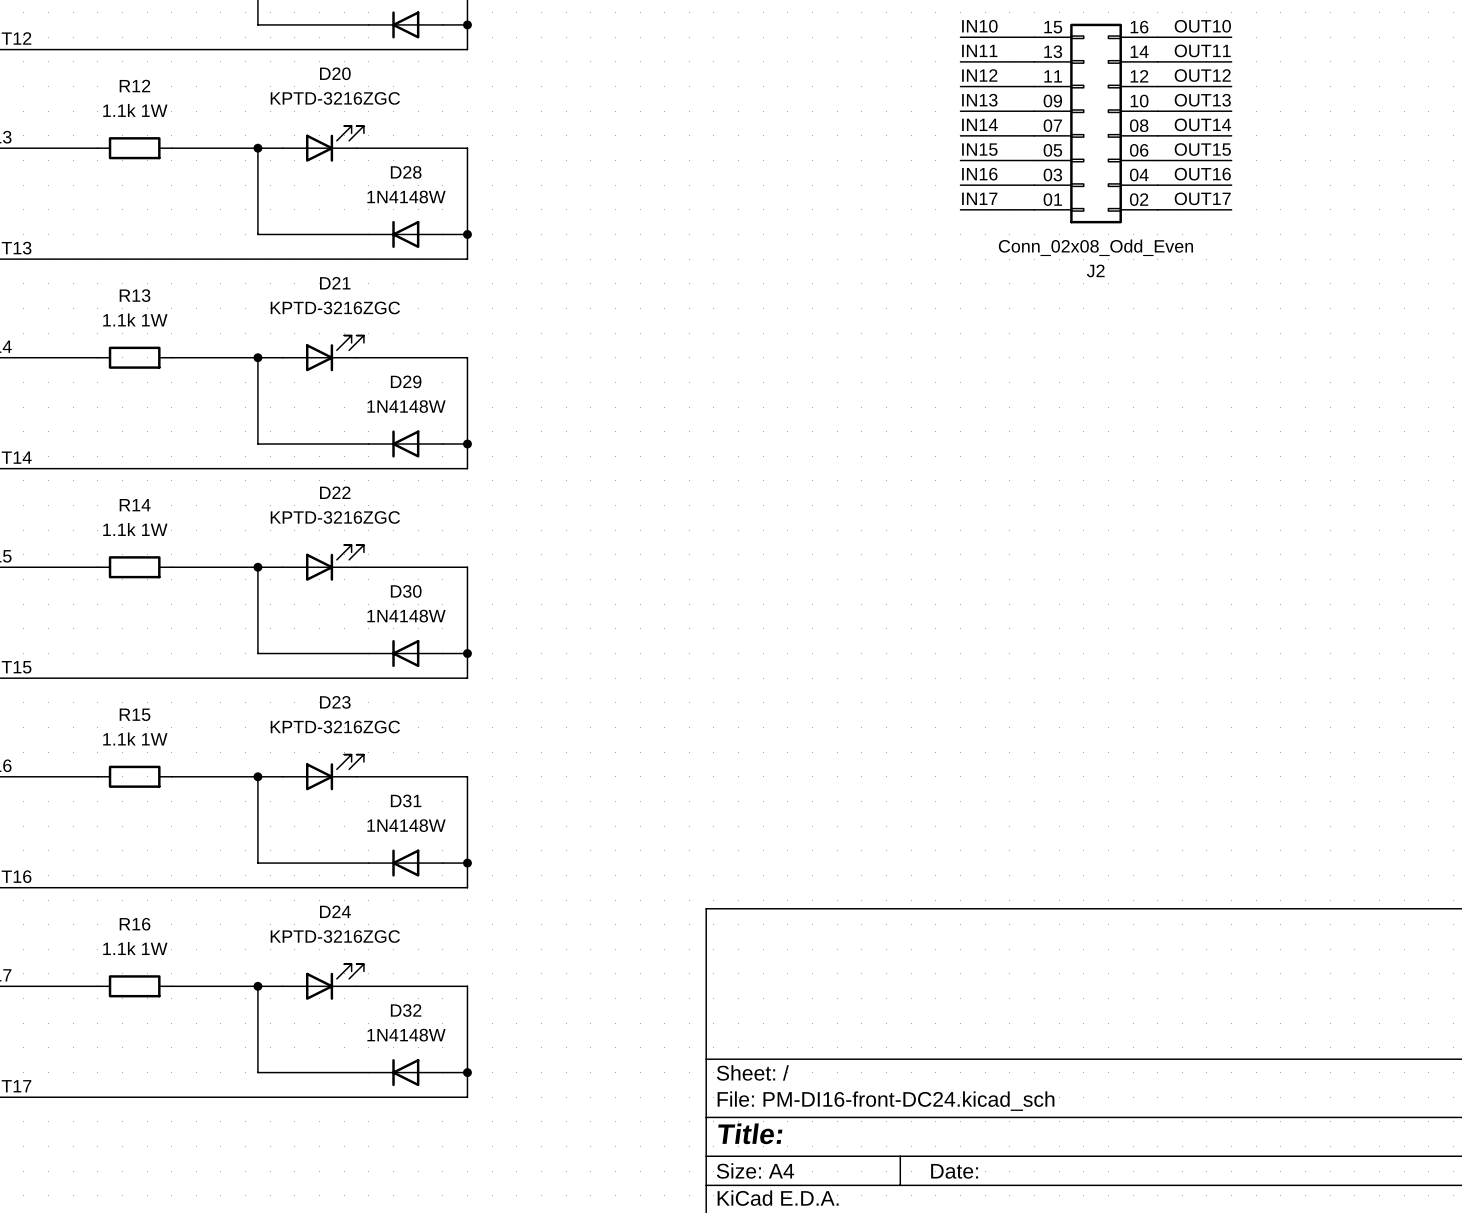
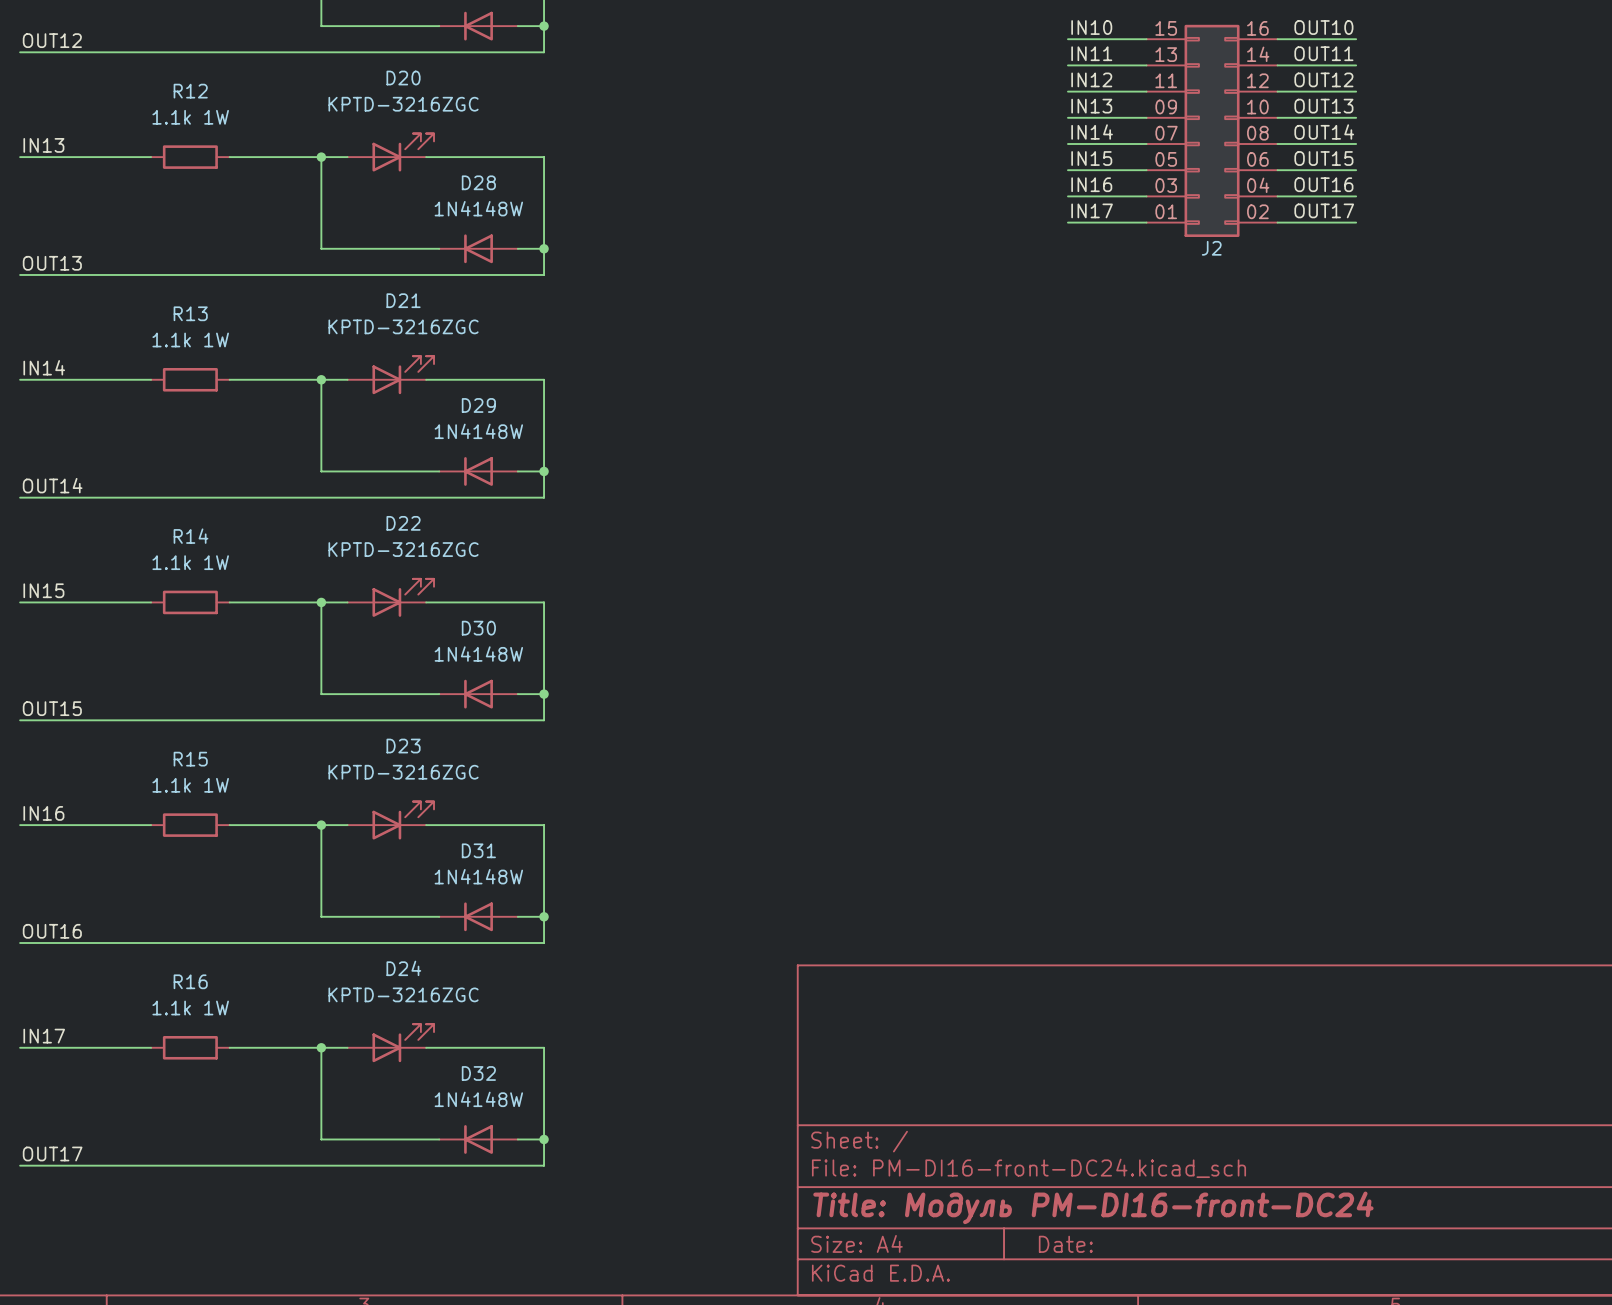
J2 value: Conn_02x08_Odd_Even (1095, 247) -> none
J2 name position: J2 (1095, 270) -> J2 (1211, 248)
title block: Title: (750, 1133) -> Title: Модуль PM-DI16-front-DC24 (1093, 1207)

